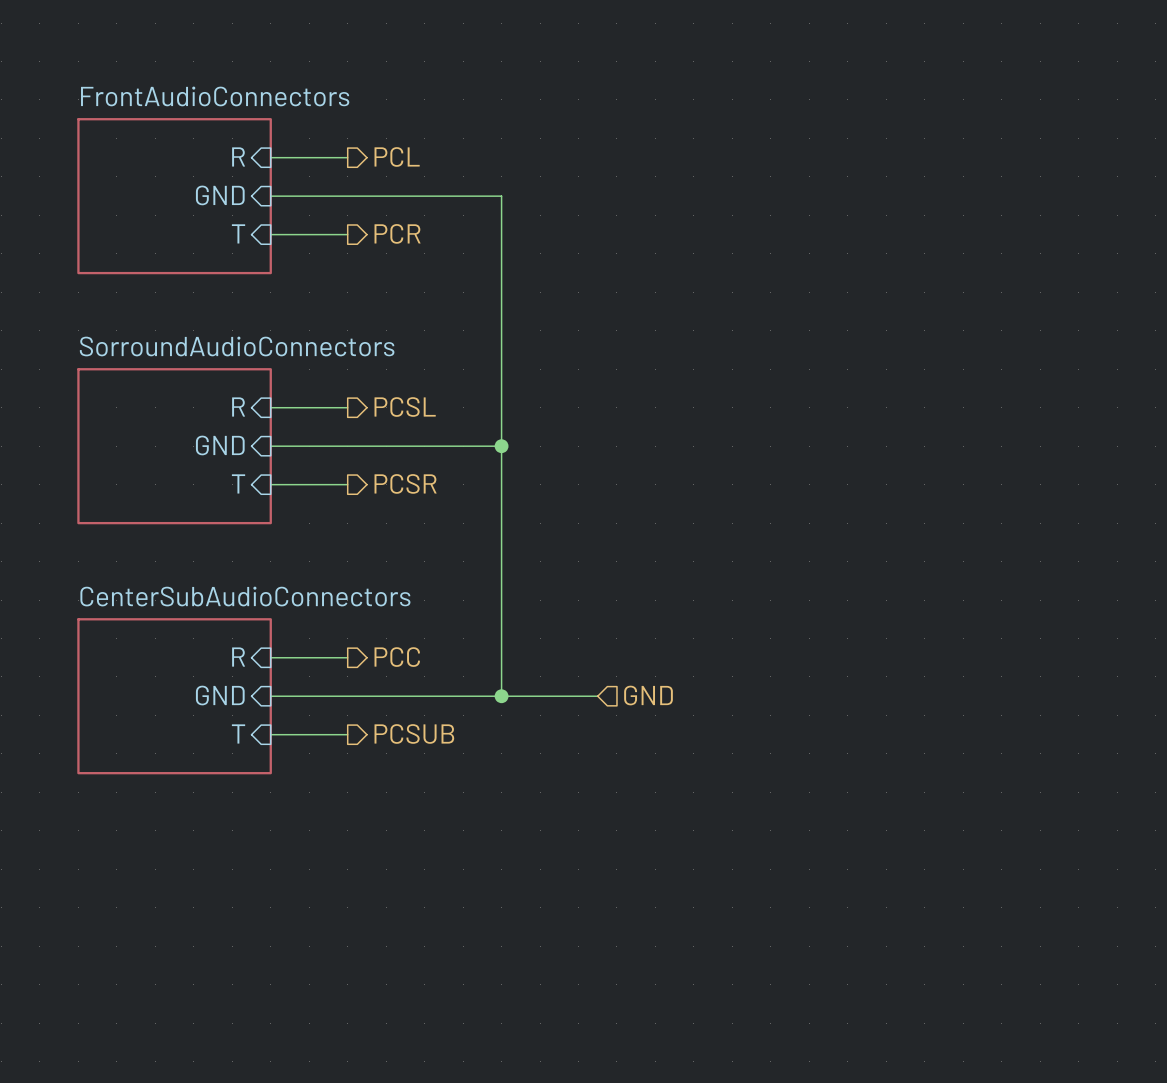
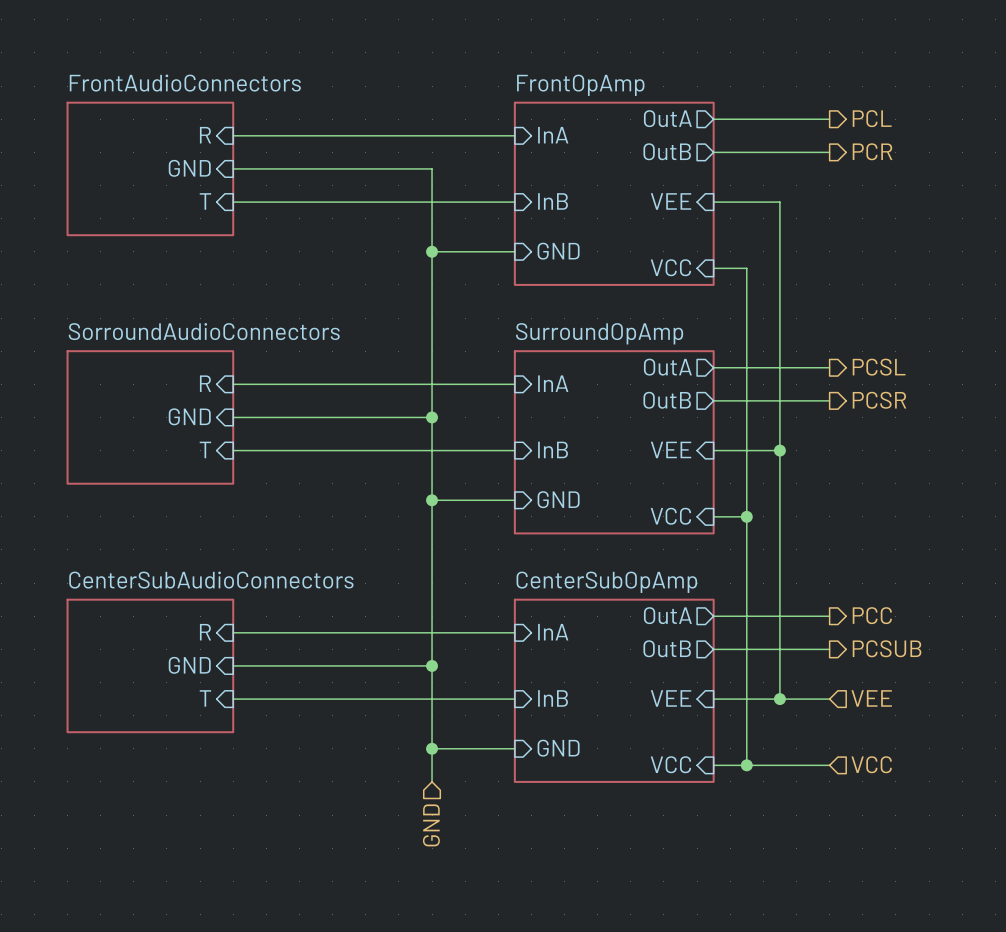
sheet pin: none -> OutA (667, 118)
hierarchical label: none -> PCL (872, 118)
wire: none -> (713, 119) (829, 119)
hierarchical label: PCL (397, 156) -> none
sheet pin: none -> InA (553, 135)
wire: none -> (299, 135) (514, 135)
sheet pin: none -> OutB (667, 151)
wire: none -> (713, 152) (829, 152)
hierarchical label: none -> PCR (872, 151)
sheet FrontOpAmp: none -> (614, 193)
hierarchical label: PCR (397, 233) -> none
sheet pin: none -> InB (553, 201)
sheet pin: none -> VEE (671, 201)
wire: none -> (299, 202) (514, 202)
wire: none -> (713, 202) (779, 202) (779, 699)
sheet pin: none -> GND (558, 251)
wire: none -> (432, 251) (514, 251)
junction: none -> (432, 251)
sheet pin: none -> VCC (670, 267)
wire: none -> (713, 268) (746, 268) (746, 765)
sheet pin: R (238, 407) -> none
wire: (270, 407) (347, 407) -> none
hierarchical label: PCSL (405, 407) -> none
sheet pin: none -> OutA (667, 367)
wire: none -> (713, 367) (829, 367)
hierarchical label: none -> PCSL (879, 367)
sheet pin: GND (220, 445) -> R (205, 383)
sheet pin: none -> InA (553, 383)
sheet SorroundAudioConnectors position: (174, 446) -> (150, 417)
wire: none -> (432, 384) (514, 384)
junction position: (501, 446) -> (432, 417)
sheet pin: none -> OutB (667, 400)
hierarchical label: none -> PCSR (879, 400)
wire: none -> (713, 400) (829, 400)
sheet pin: T (238, 483) -> GND (189, 416)
hierarchical label: PCSR (405, 483) -> none
wire: none -> (299, 417) (432, 417)
sheet SurroundOpAmp: none -> (614, 442)
sheet pin: none -> T (205, 449)
sheet pin: none -> InB (553, 449)
sheet pin: none -> VEE (671, 449)
wire: none -> (233, 450) (514, 450)
wire: none -> (713, 450) (779, 450)
junction: none -> (779, 450)
wire: none -> (432, 500) (514, 500)
junction: none -> (432, 500)
sheet pin: none -> GND (558, 499)
sheet pin: none -> VCC (670, 516)
wire: none -> (713, 516) (746, 516)
junction: none -> (746, 516)
sheet pin: R (238, 657) -> none
wire: (270, 657) (347, 657) -> none
hierarchical label: PCC (397, 657) -> none
sheet pin position: GND (220, 695) -> GND (189, 665)
hierarchical label rotation: 0° (648, 695) -> 90° clockwise (431, 825)
hierarchical label position: GND (648, 695) -> GND (431, 825)
sheet CenterSubAudioConnectors position: (174, 696) -> (150, 665)
wire: (270, 696) (597, 696) -> (233, 699) (514, 699)
wire: none -> (432, 599) (432, 781)
junction: (501, 696) -> none
sheet pin: none -> OutA (667, 615)
hierarchical label: none -> PCC (872, 615)
wire: none -> (713, 616) (829, 616)
sheet pin: T (238, 733) -> R (205, 632)
hierarchical label: PCSUB (414, 733) -> none
sheet pin: none -> InA (553, 632)
wire: none -> (299, 632) (514, 632)
sheet pin: none -> OutB (667, 648)
wire: none -> (713, 649) (829, 649)
hierarchical label: none -> PCSUB (887, 648)
wire: none -> (233, 665) (432, 665)
junction: none -> (432, 665)
sheet CenterSubOpAmp: none -> (614, 690)
sheet pin: none -> T (205, 698)
sheet pin: none -> InB (553, 698)
sheet pin: none -> VEE (671, 698)
hierarchical label: none -> VEE (871, 698)
wire: none -> (713, 699) (829, 699)
junction: none -> (779, 699)
sheet pin: none -> GND (558, 748)
wire: none -> (432, 748) (514, 748)
junction: none -> (432, 748)
sheet pin: none -> VCC (670, 764)
hierarchical label: none -> VCC (871, 764)
wire: none -> (713, 765) (829, 765)
junction: none -> (746, 765)

